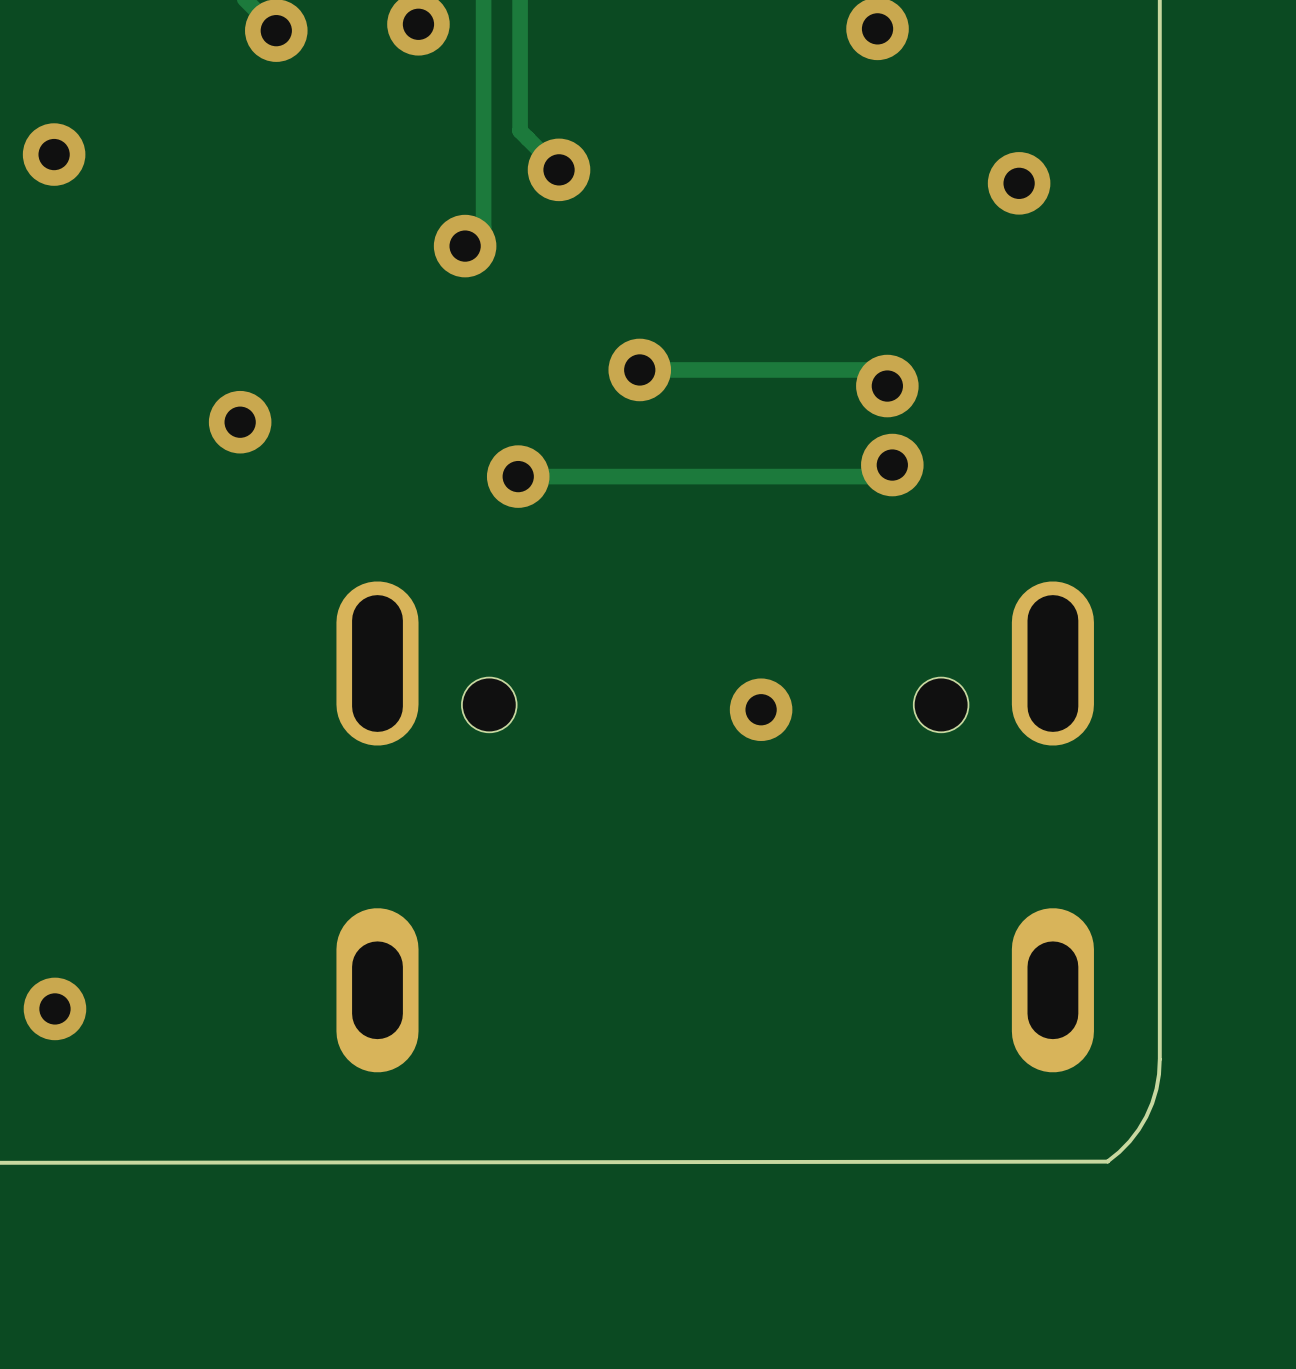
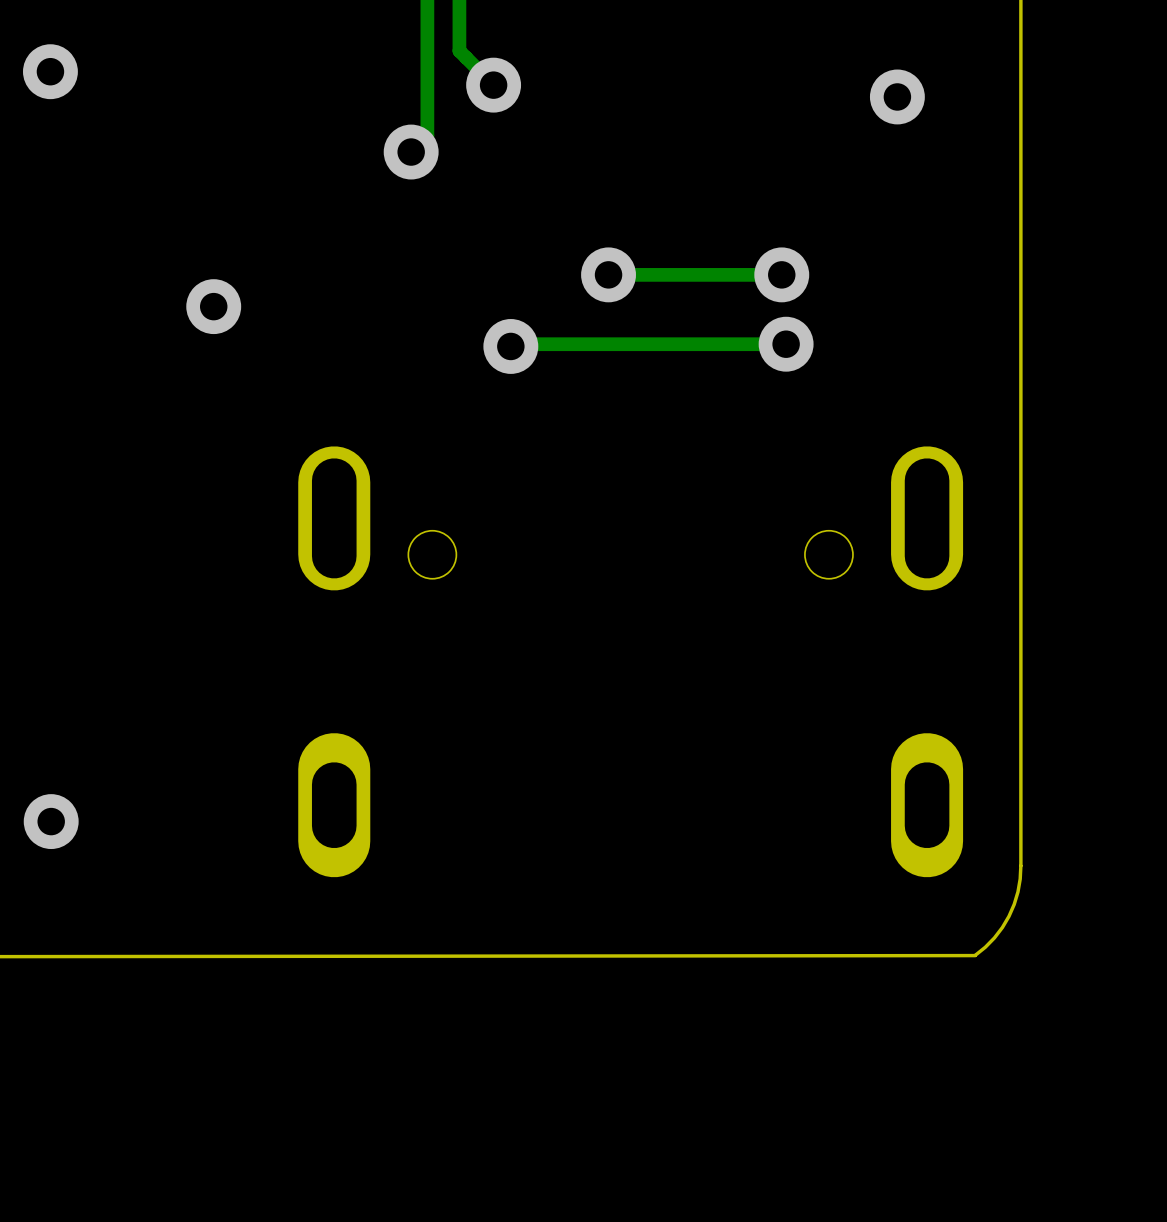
track: (639, 369) (871, 369) (887, 386) -> (608, 274) (781, 274)
via position: (639, 369) -> (608, 274)
track: (892, 465) (880, 476) (518, 476) -> (786, 344) (513, 344) (510, 346)
via position: (518, 476) -> (510, 346)
via: (761, 709) -> none

